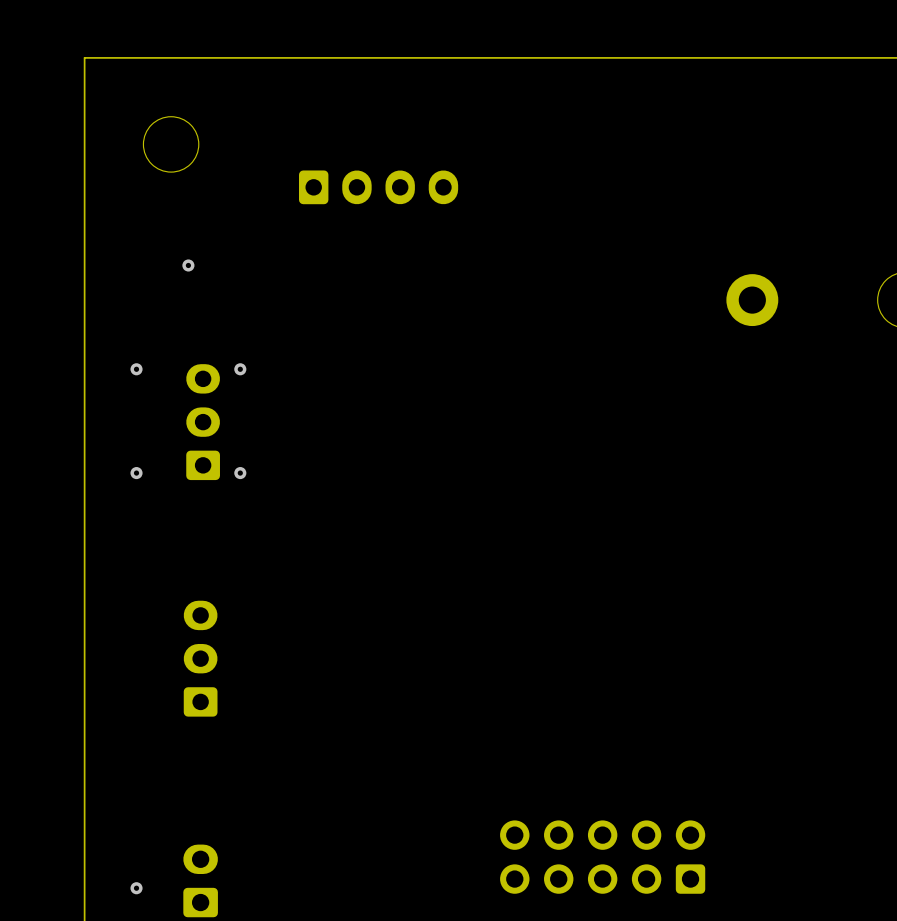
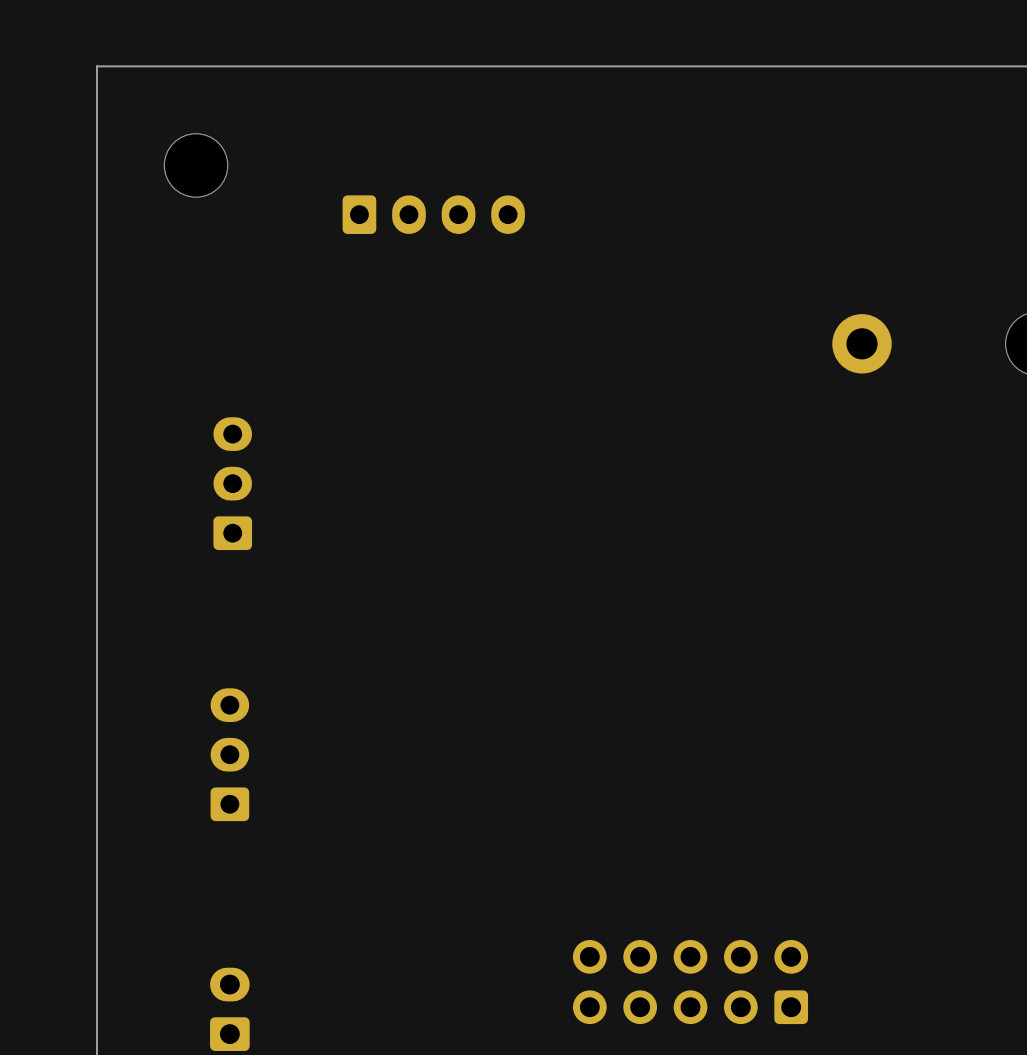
via: (188, 265) -> none
via: (136, 369) -> none
via: (240, 369) -> none
via: (136, 473) -> none
via: (240, 473) -> none
via: (136, 888) -> none

